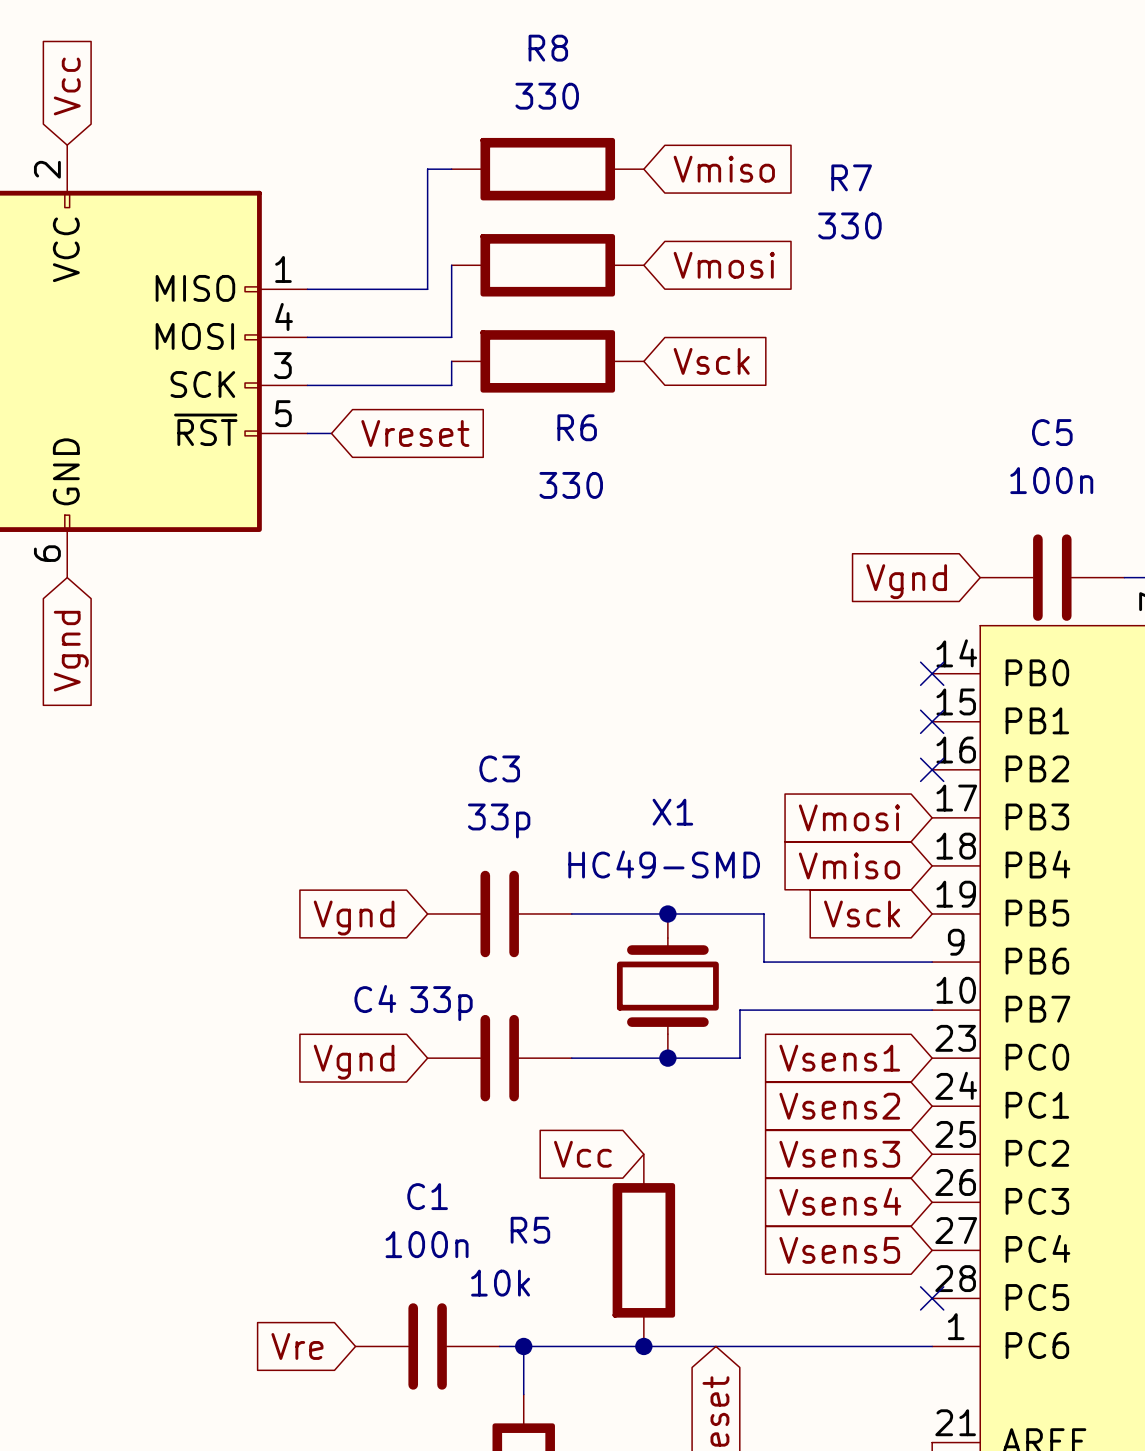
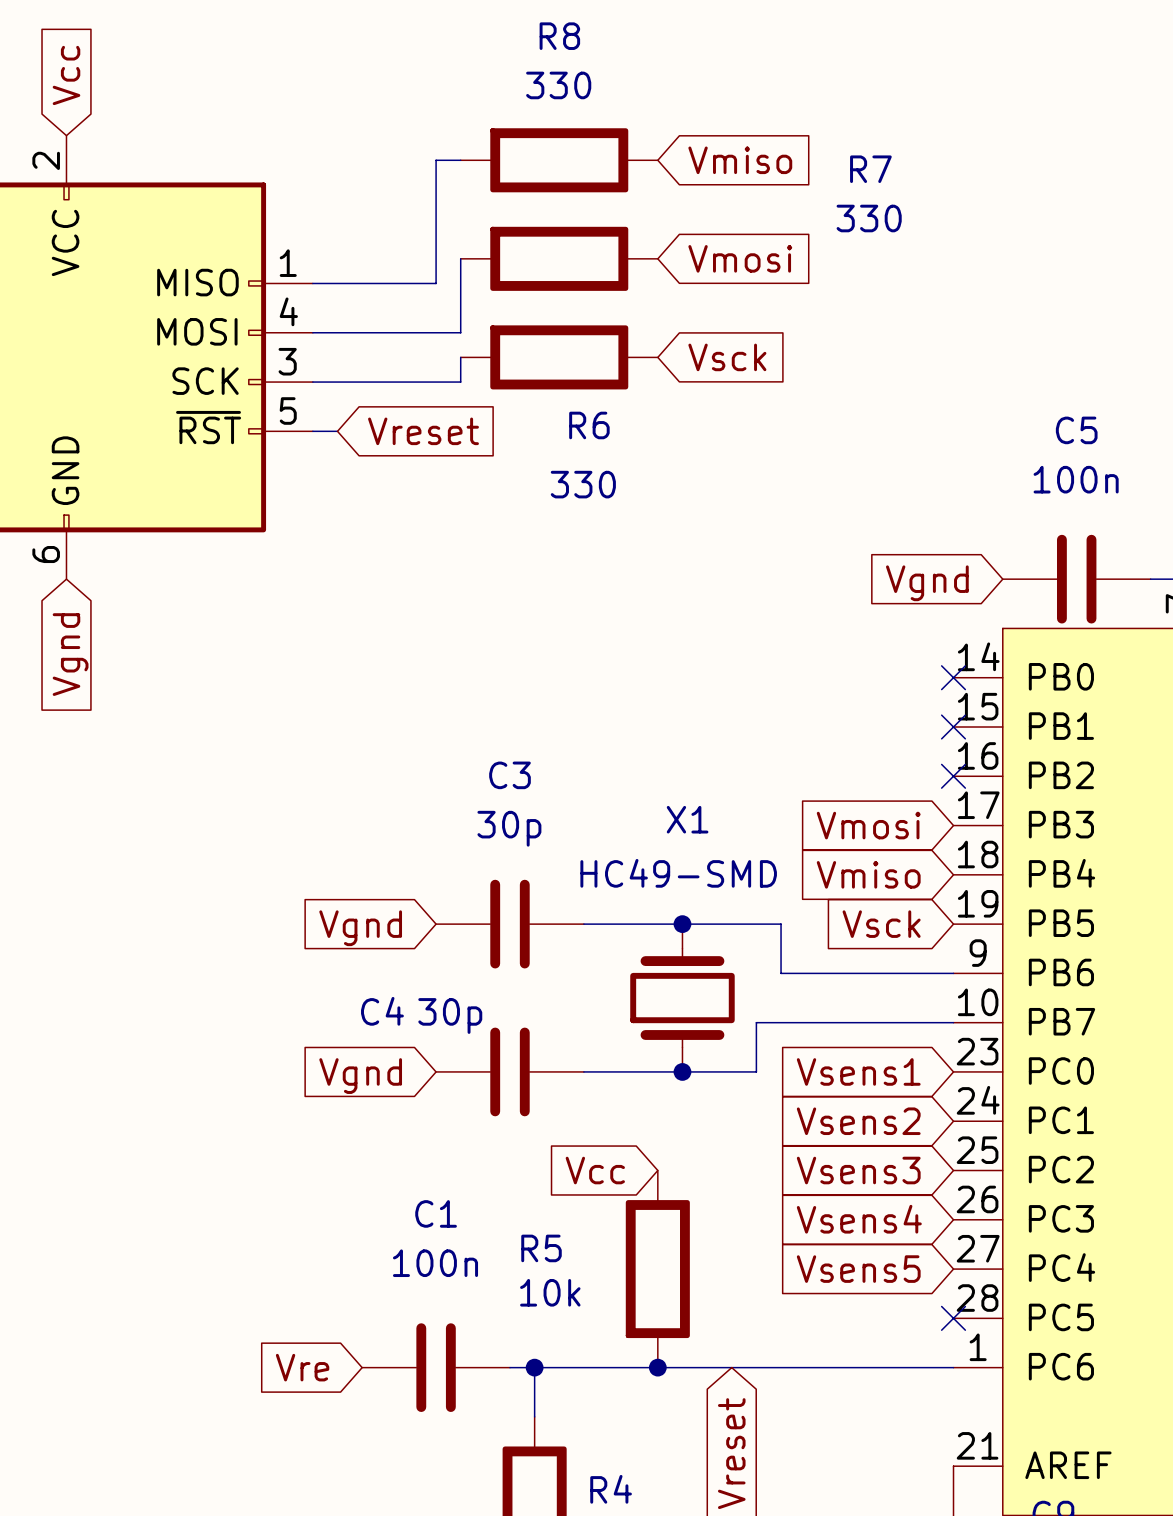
C3 value: 33p (499, 820) -> 30p (509, 828)
C4 value: 33p (441, 1003) -> 30p (450, 1016)
R5 value position: 10k (500, 1283) -> 10k (550, 1292)

